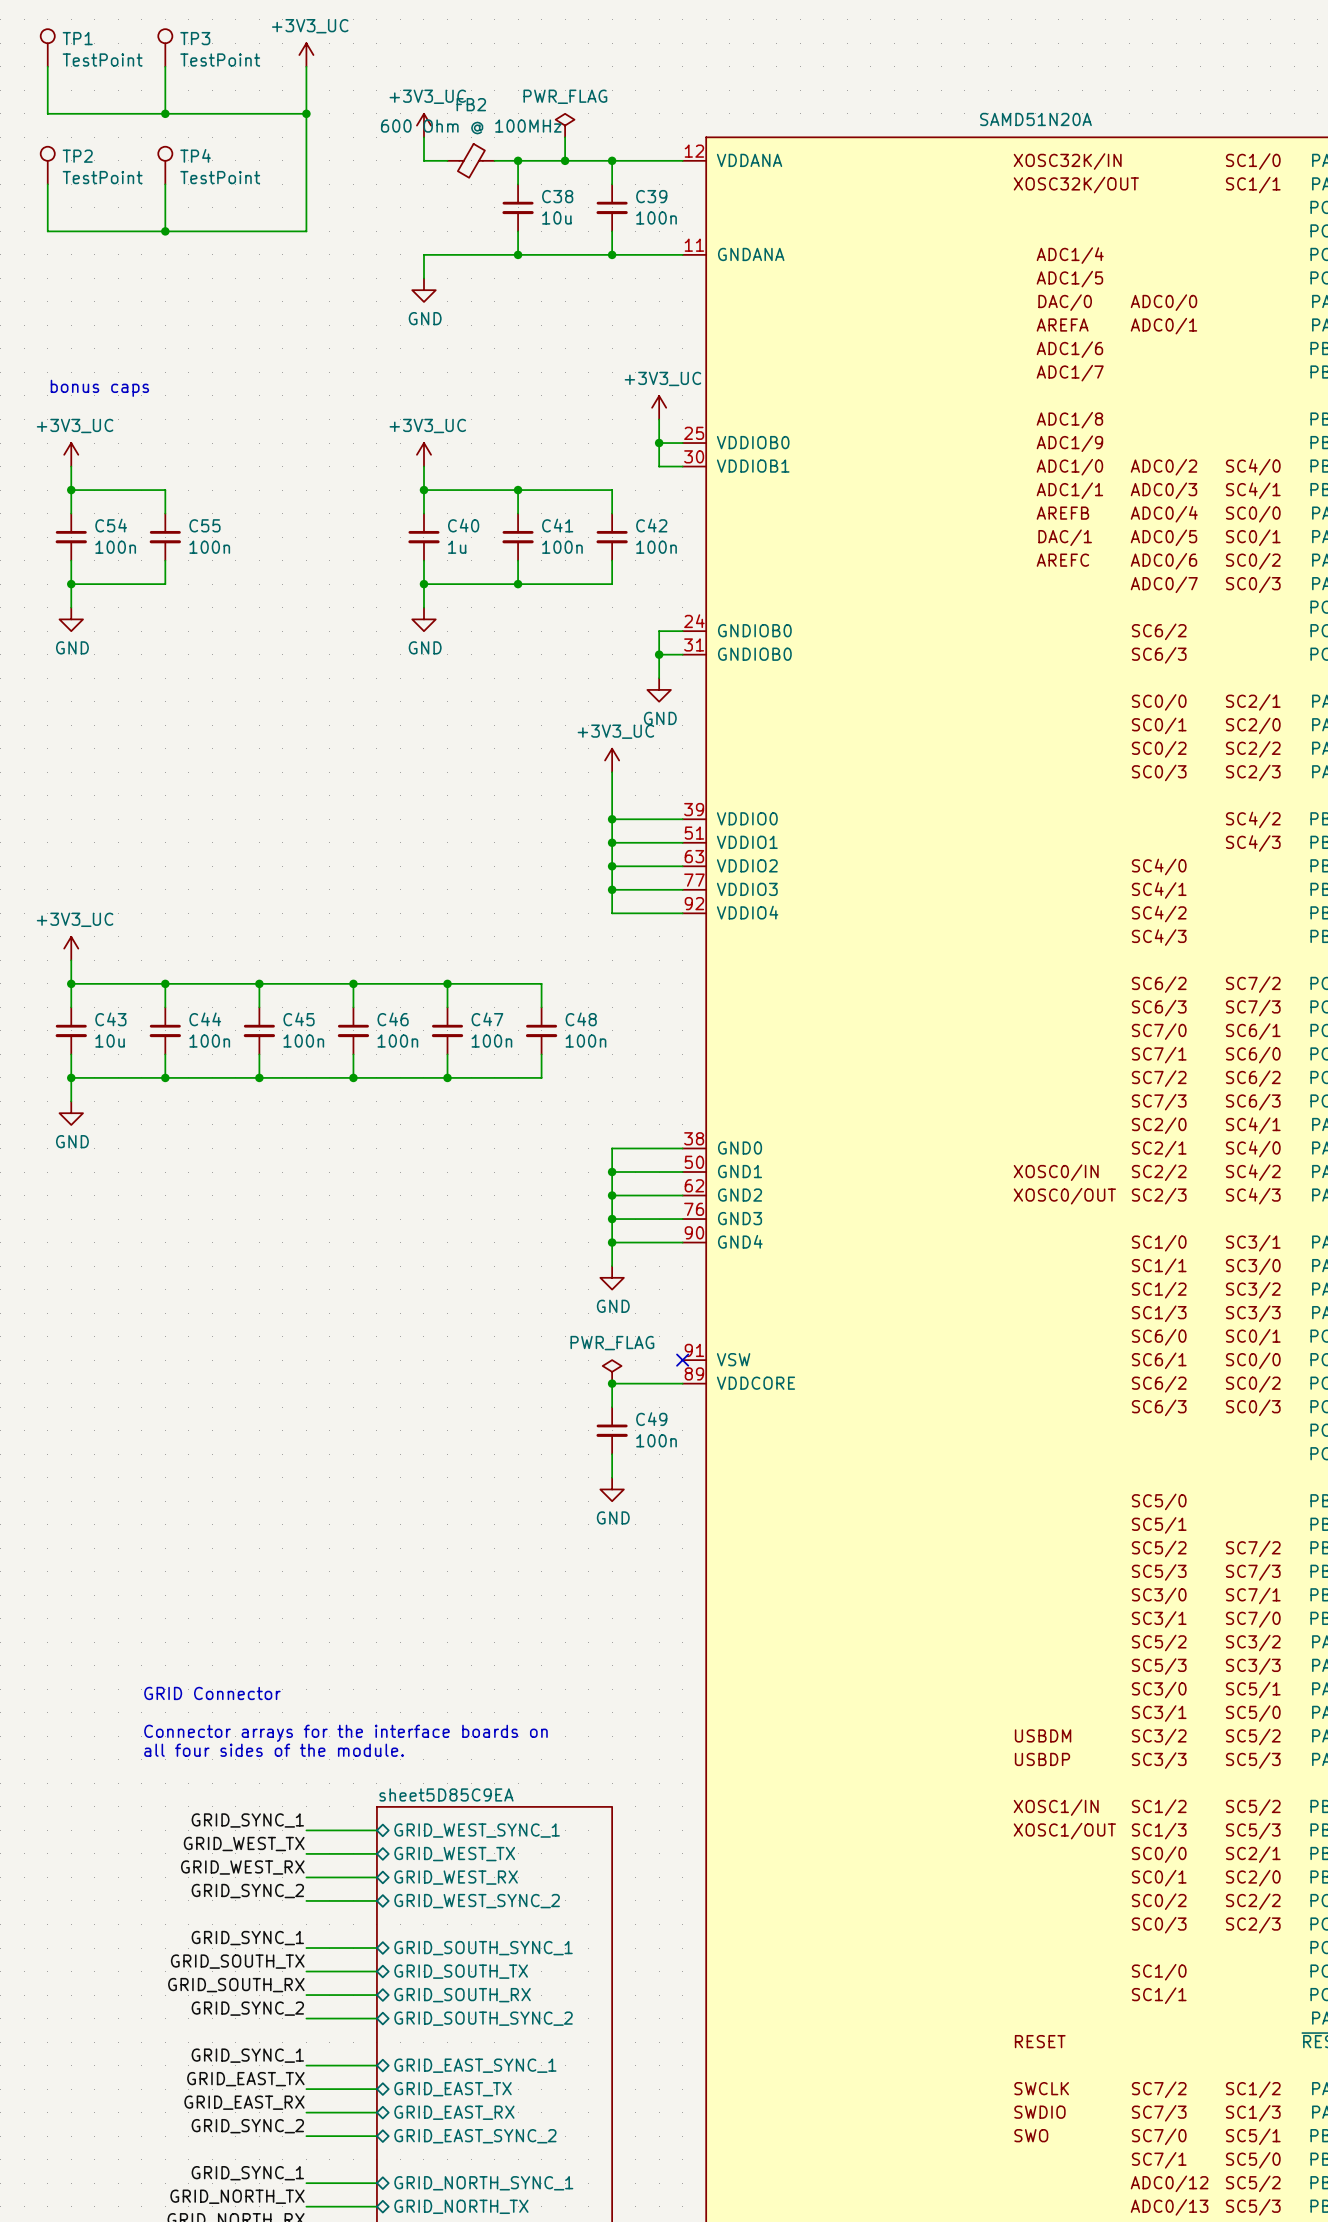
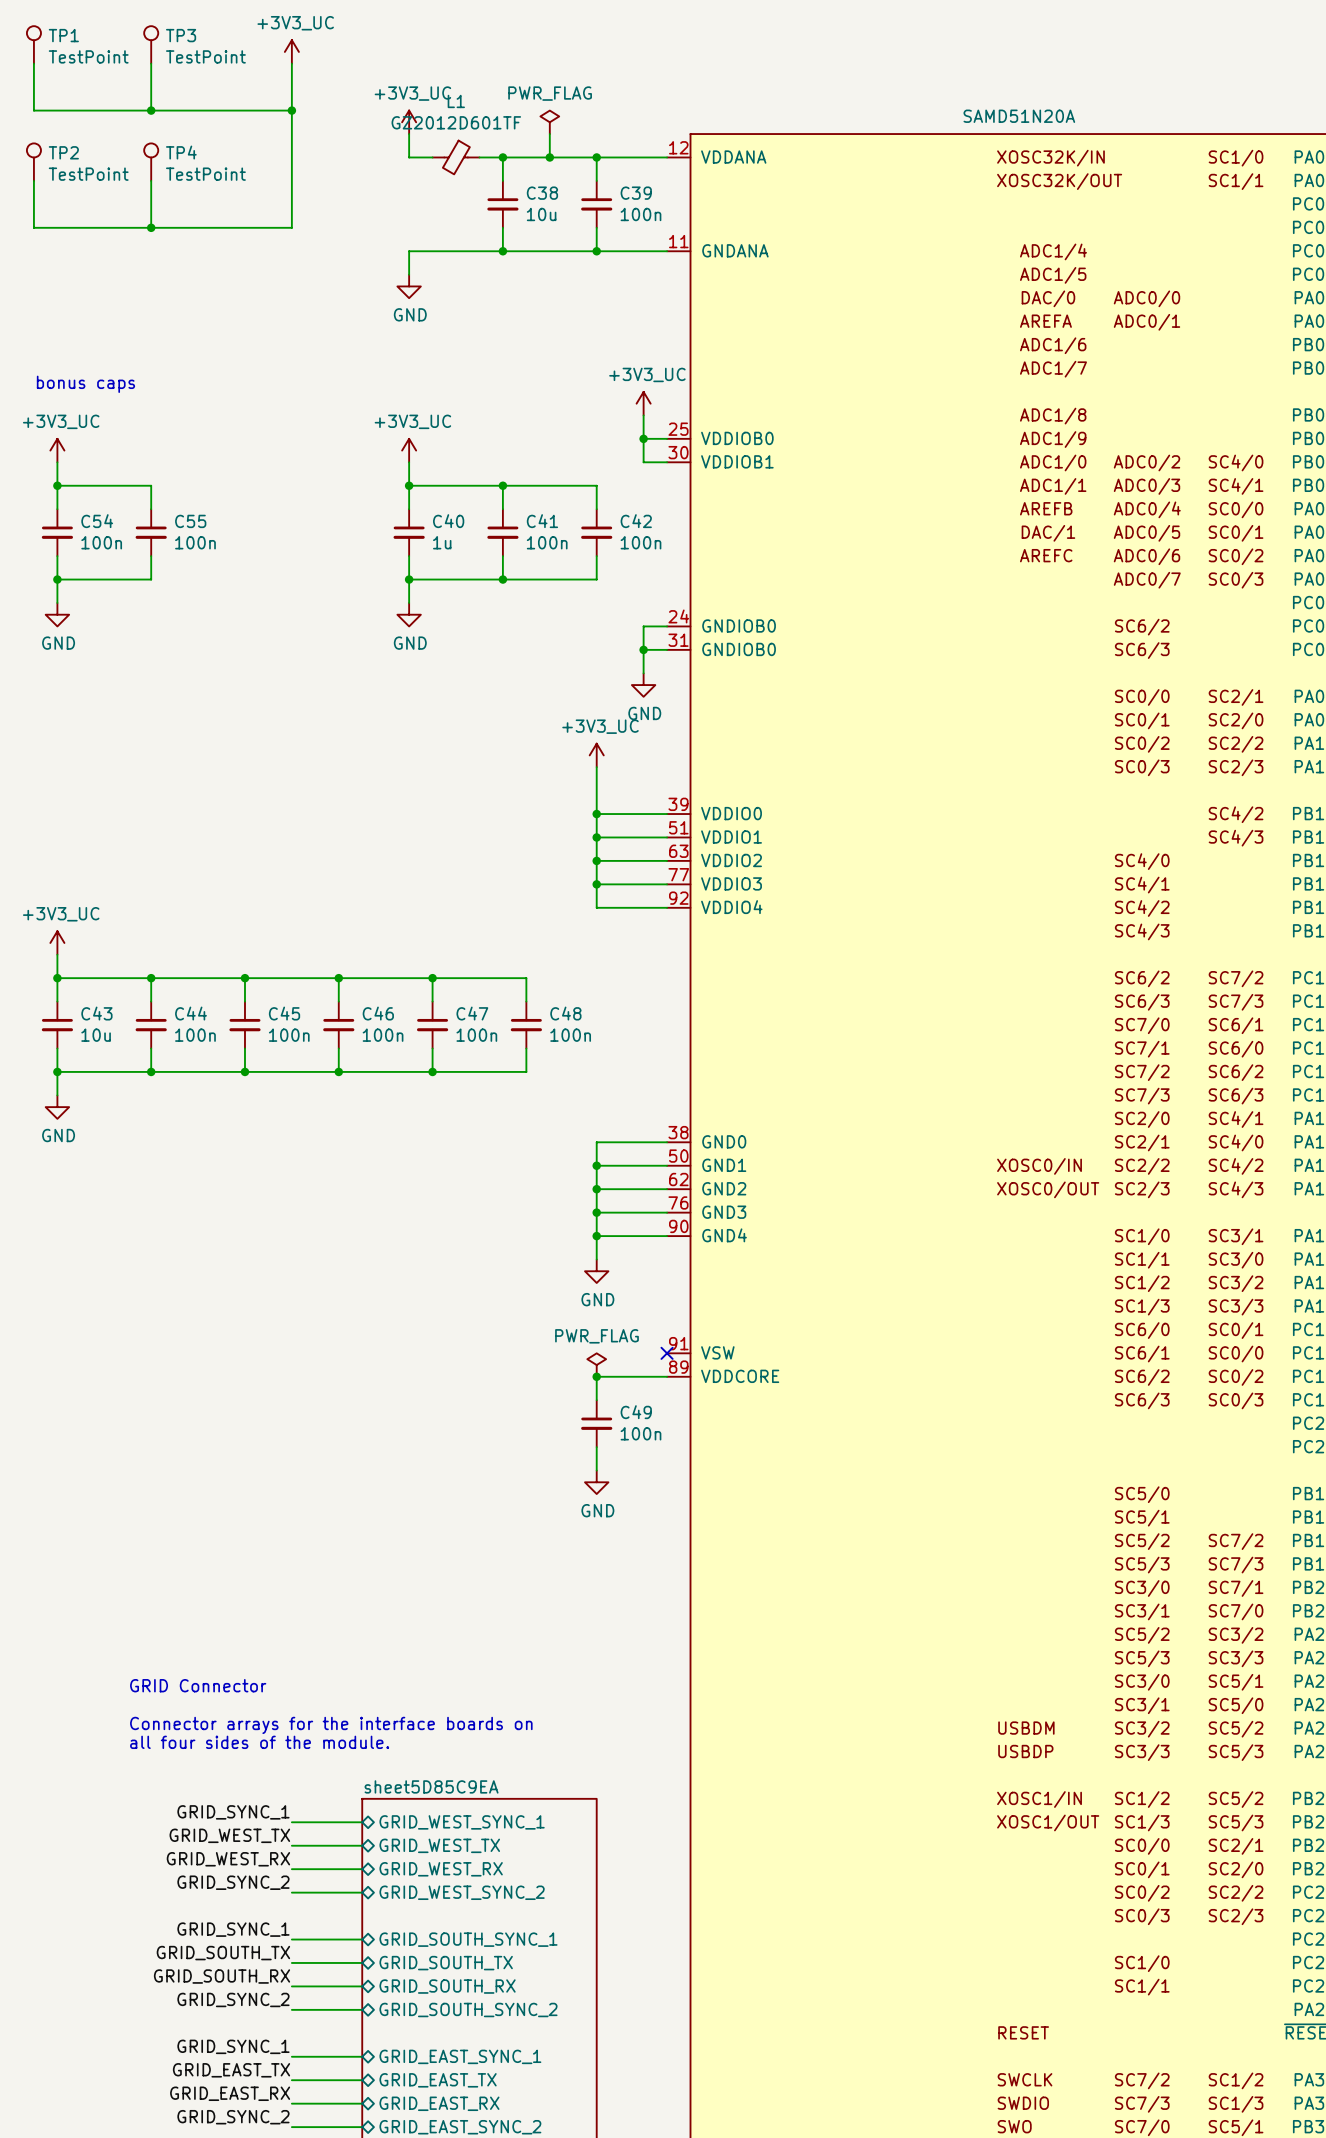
FB2 name: FB2 (471, 104) -> L1 (456, 101)
FB2 value: 600 Ohm @ 100MHz (471, 126) -> GZ2012D601TF (456, 122)

